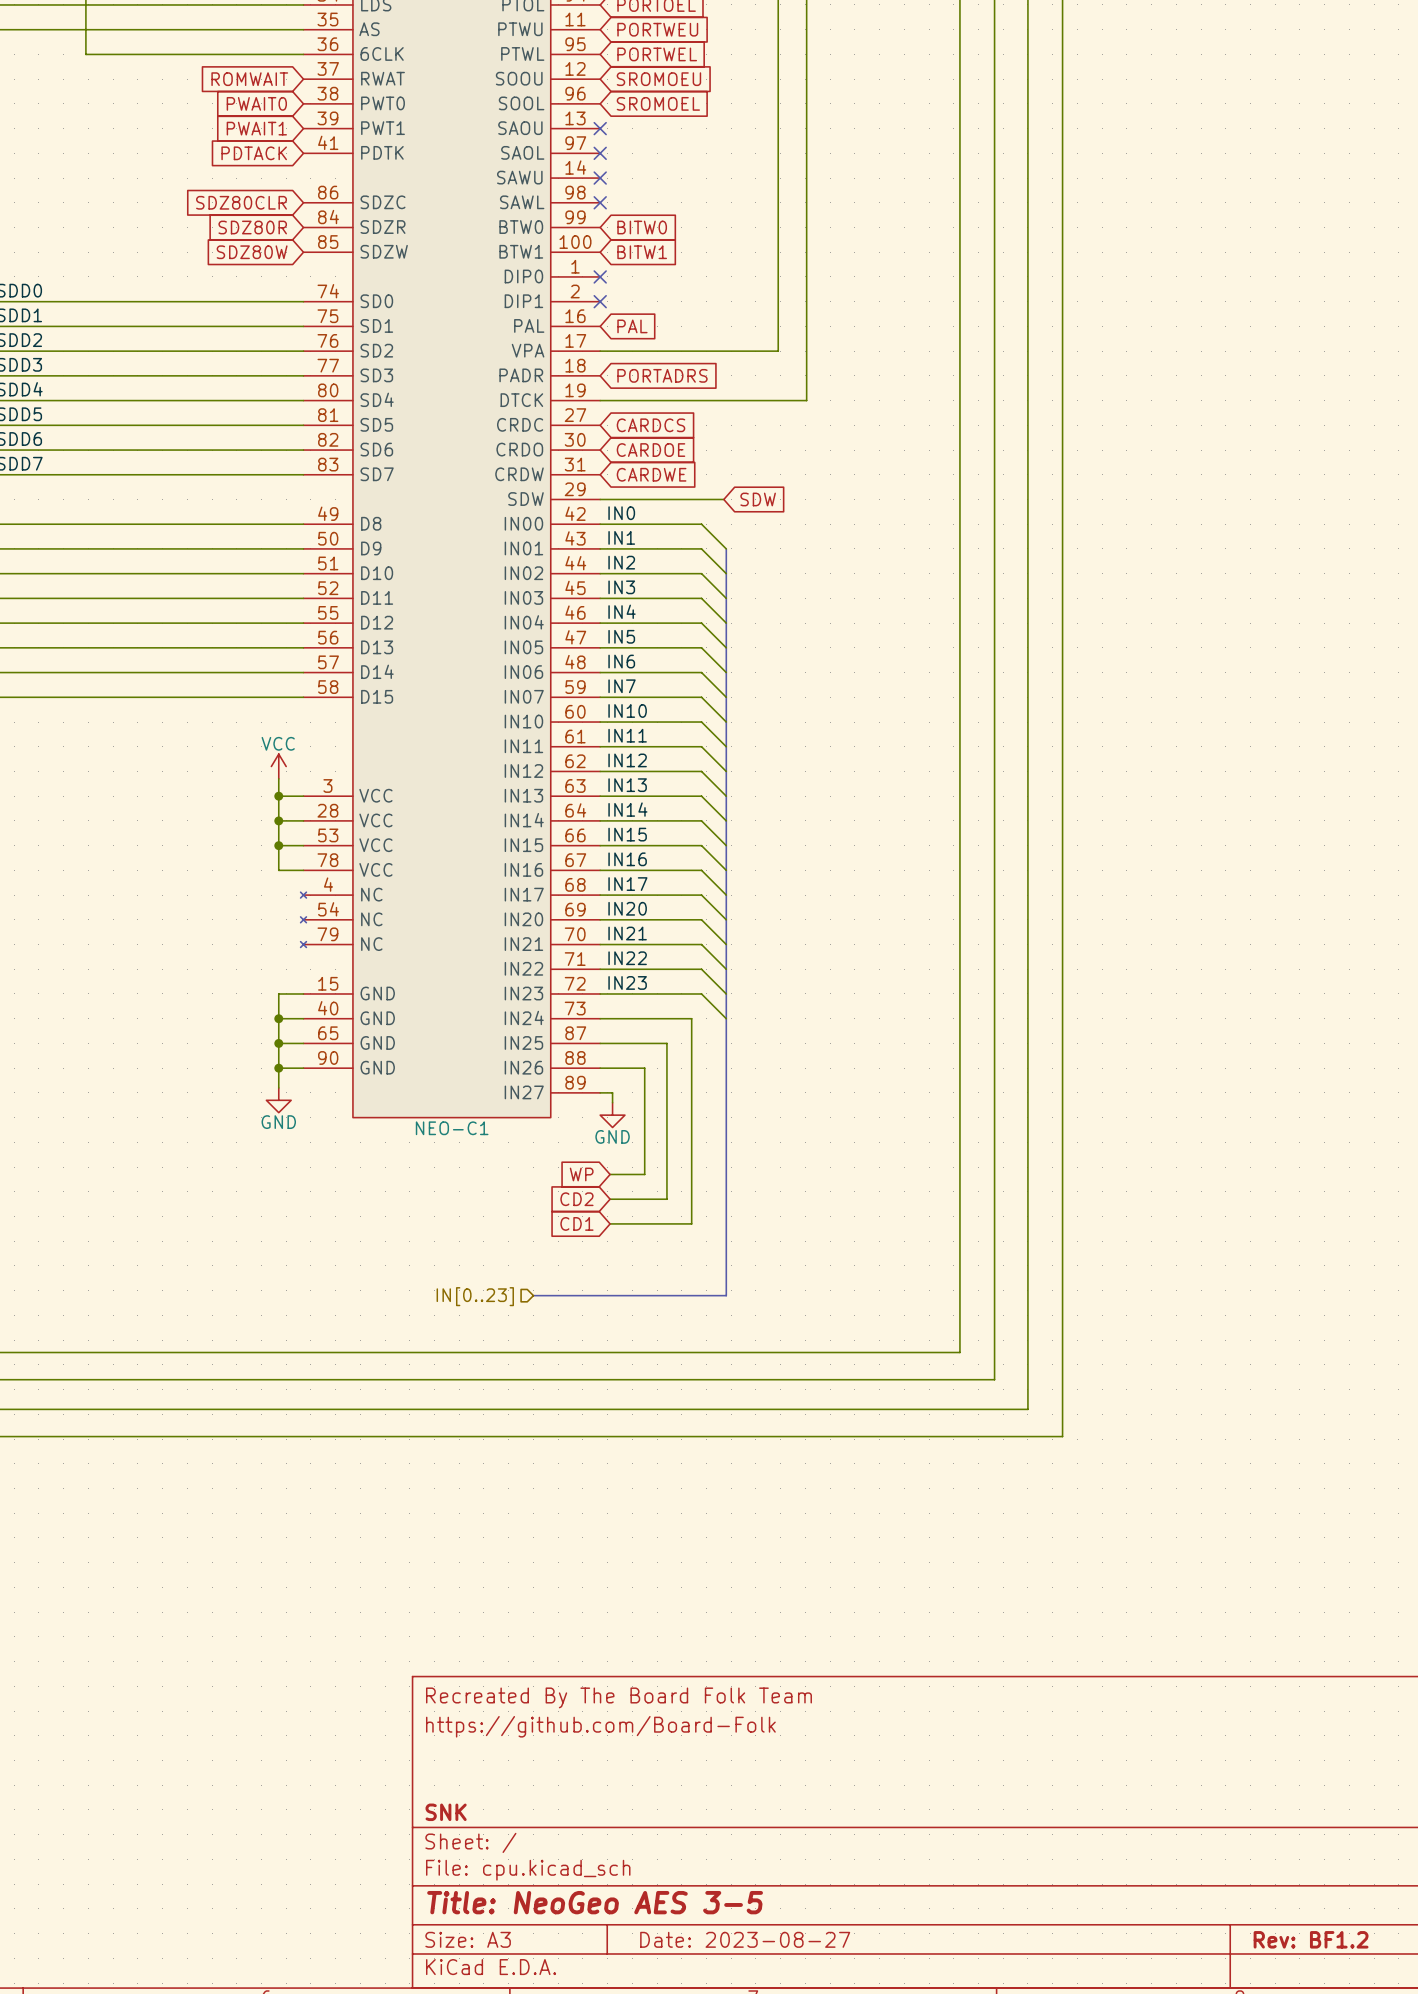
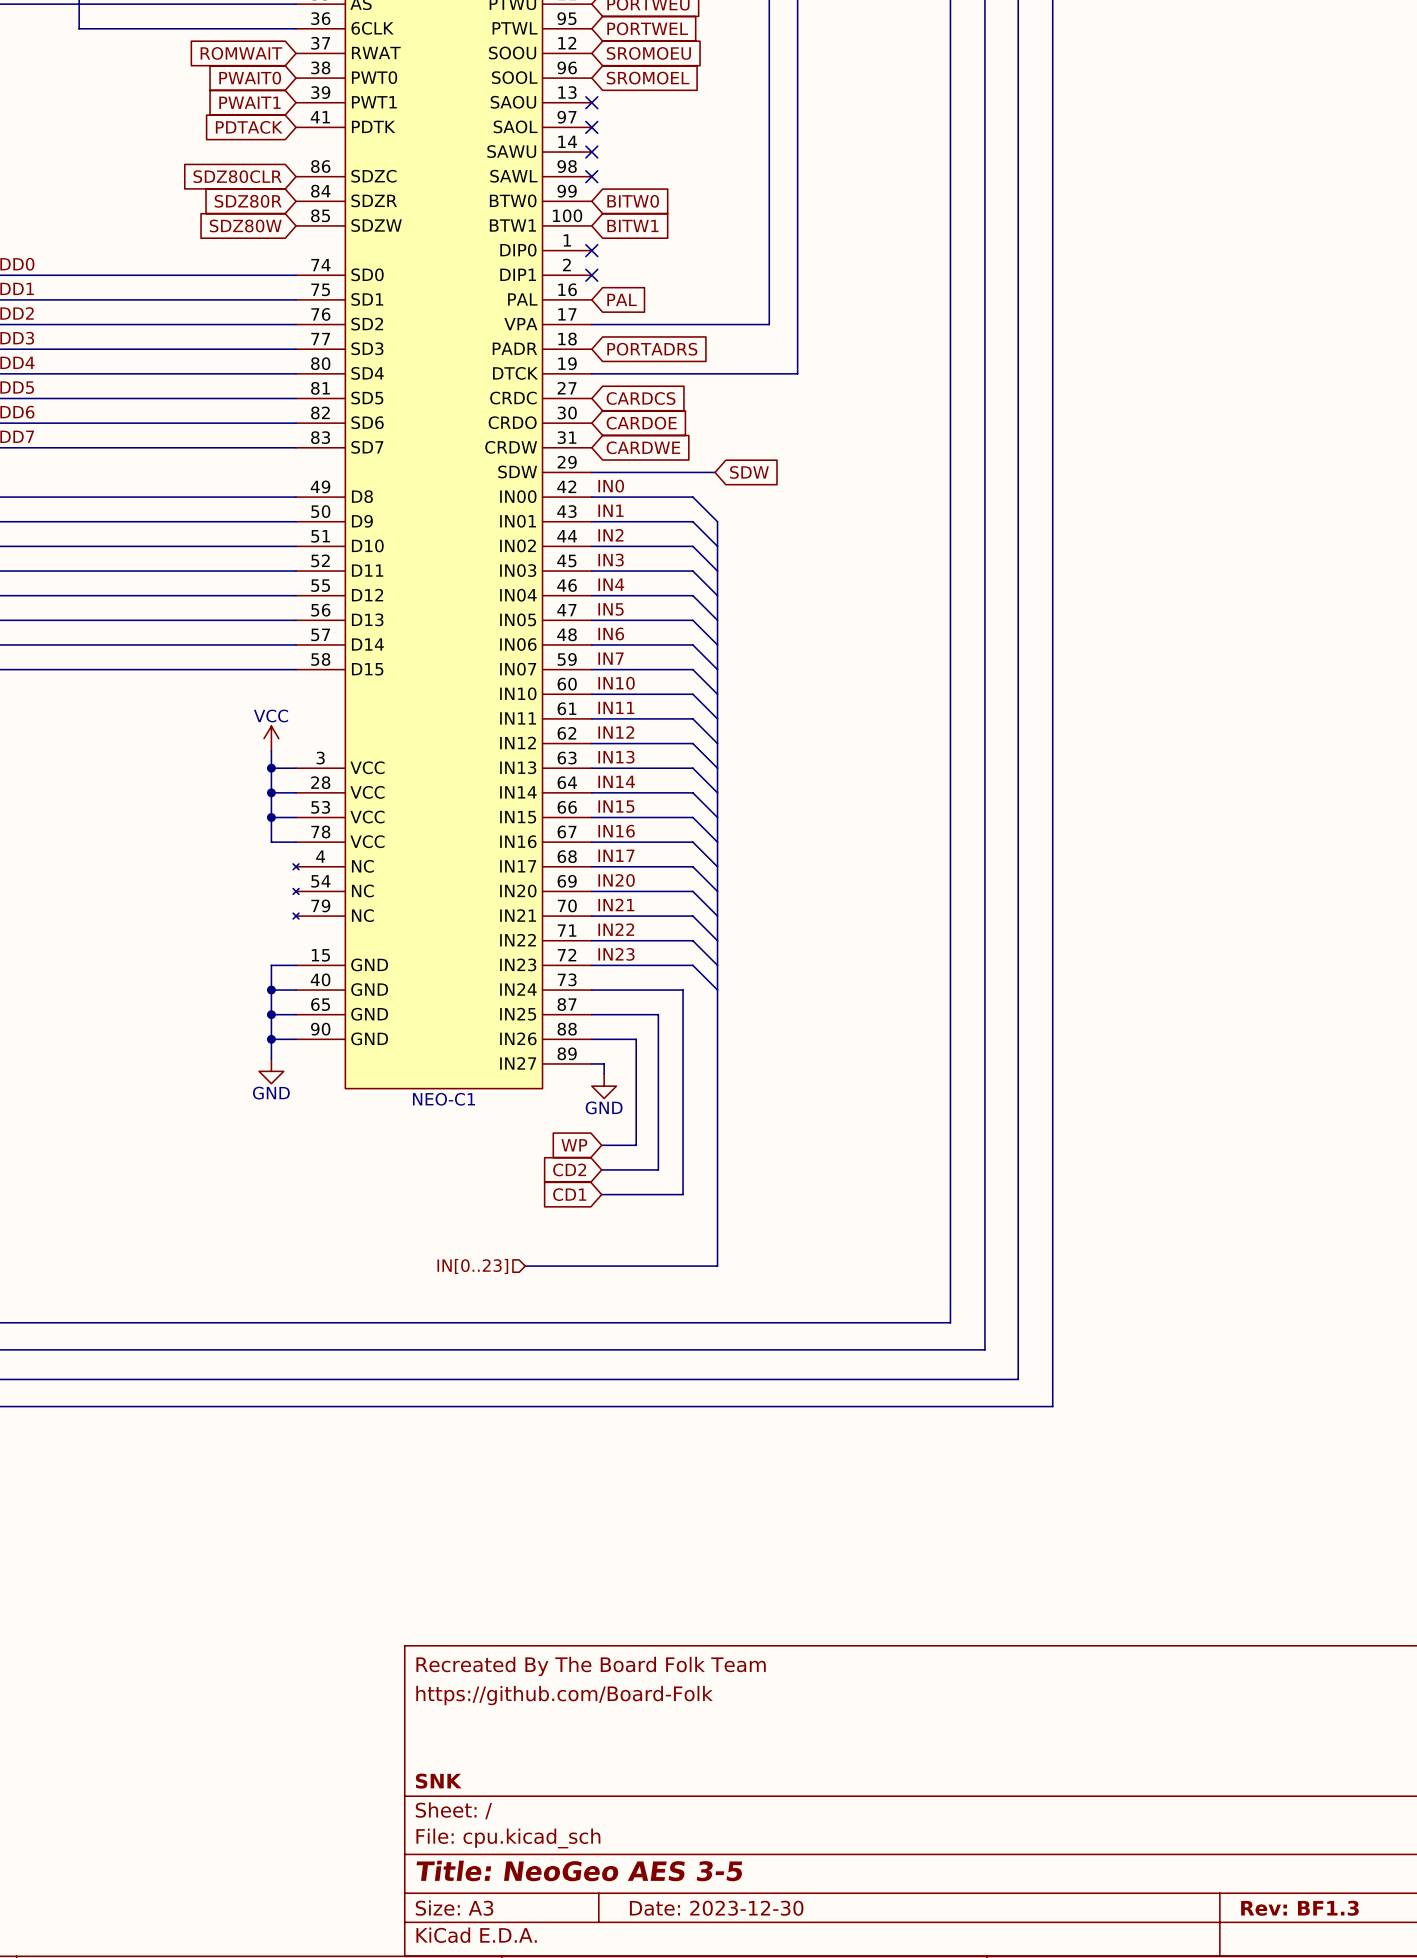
title block: Date: 2023-08-27 (745, 1939) -> Date: 2023-12-30 (716, 1908)
title block: Rev: BF1.2 (1311, 1939) -> Rev: BF1.3 (1299, 1908)

